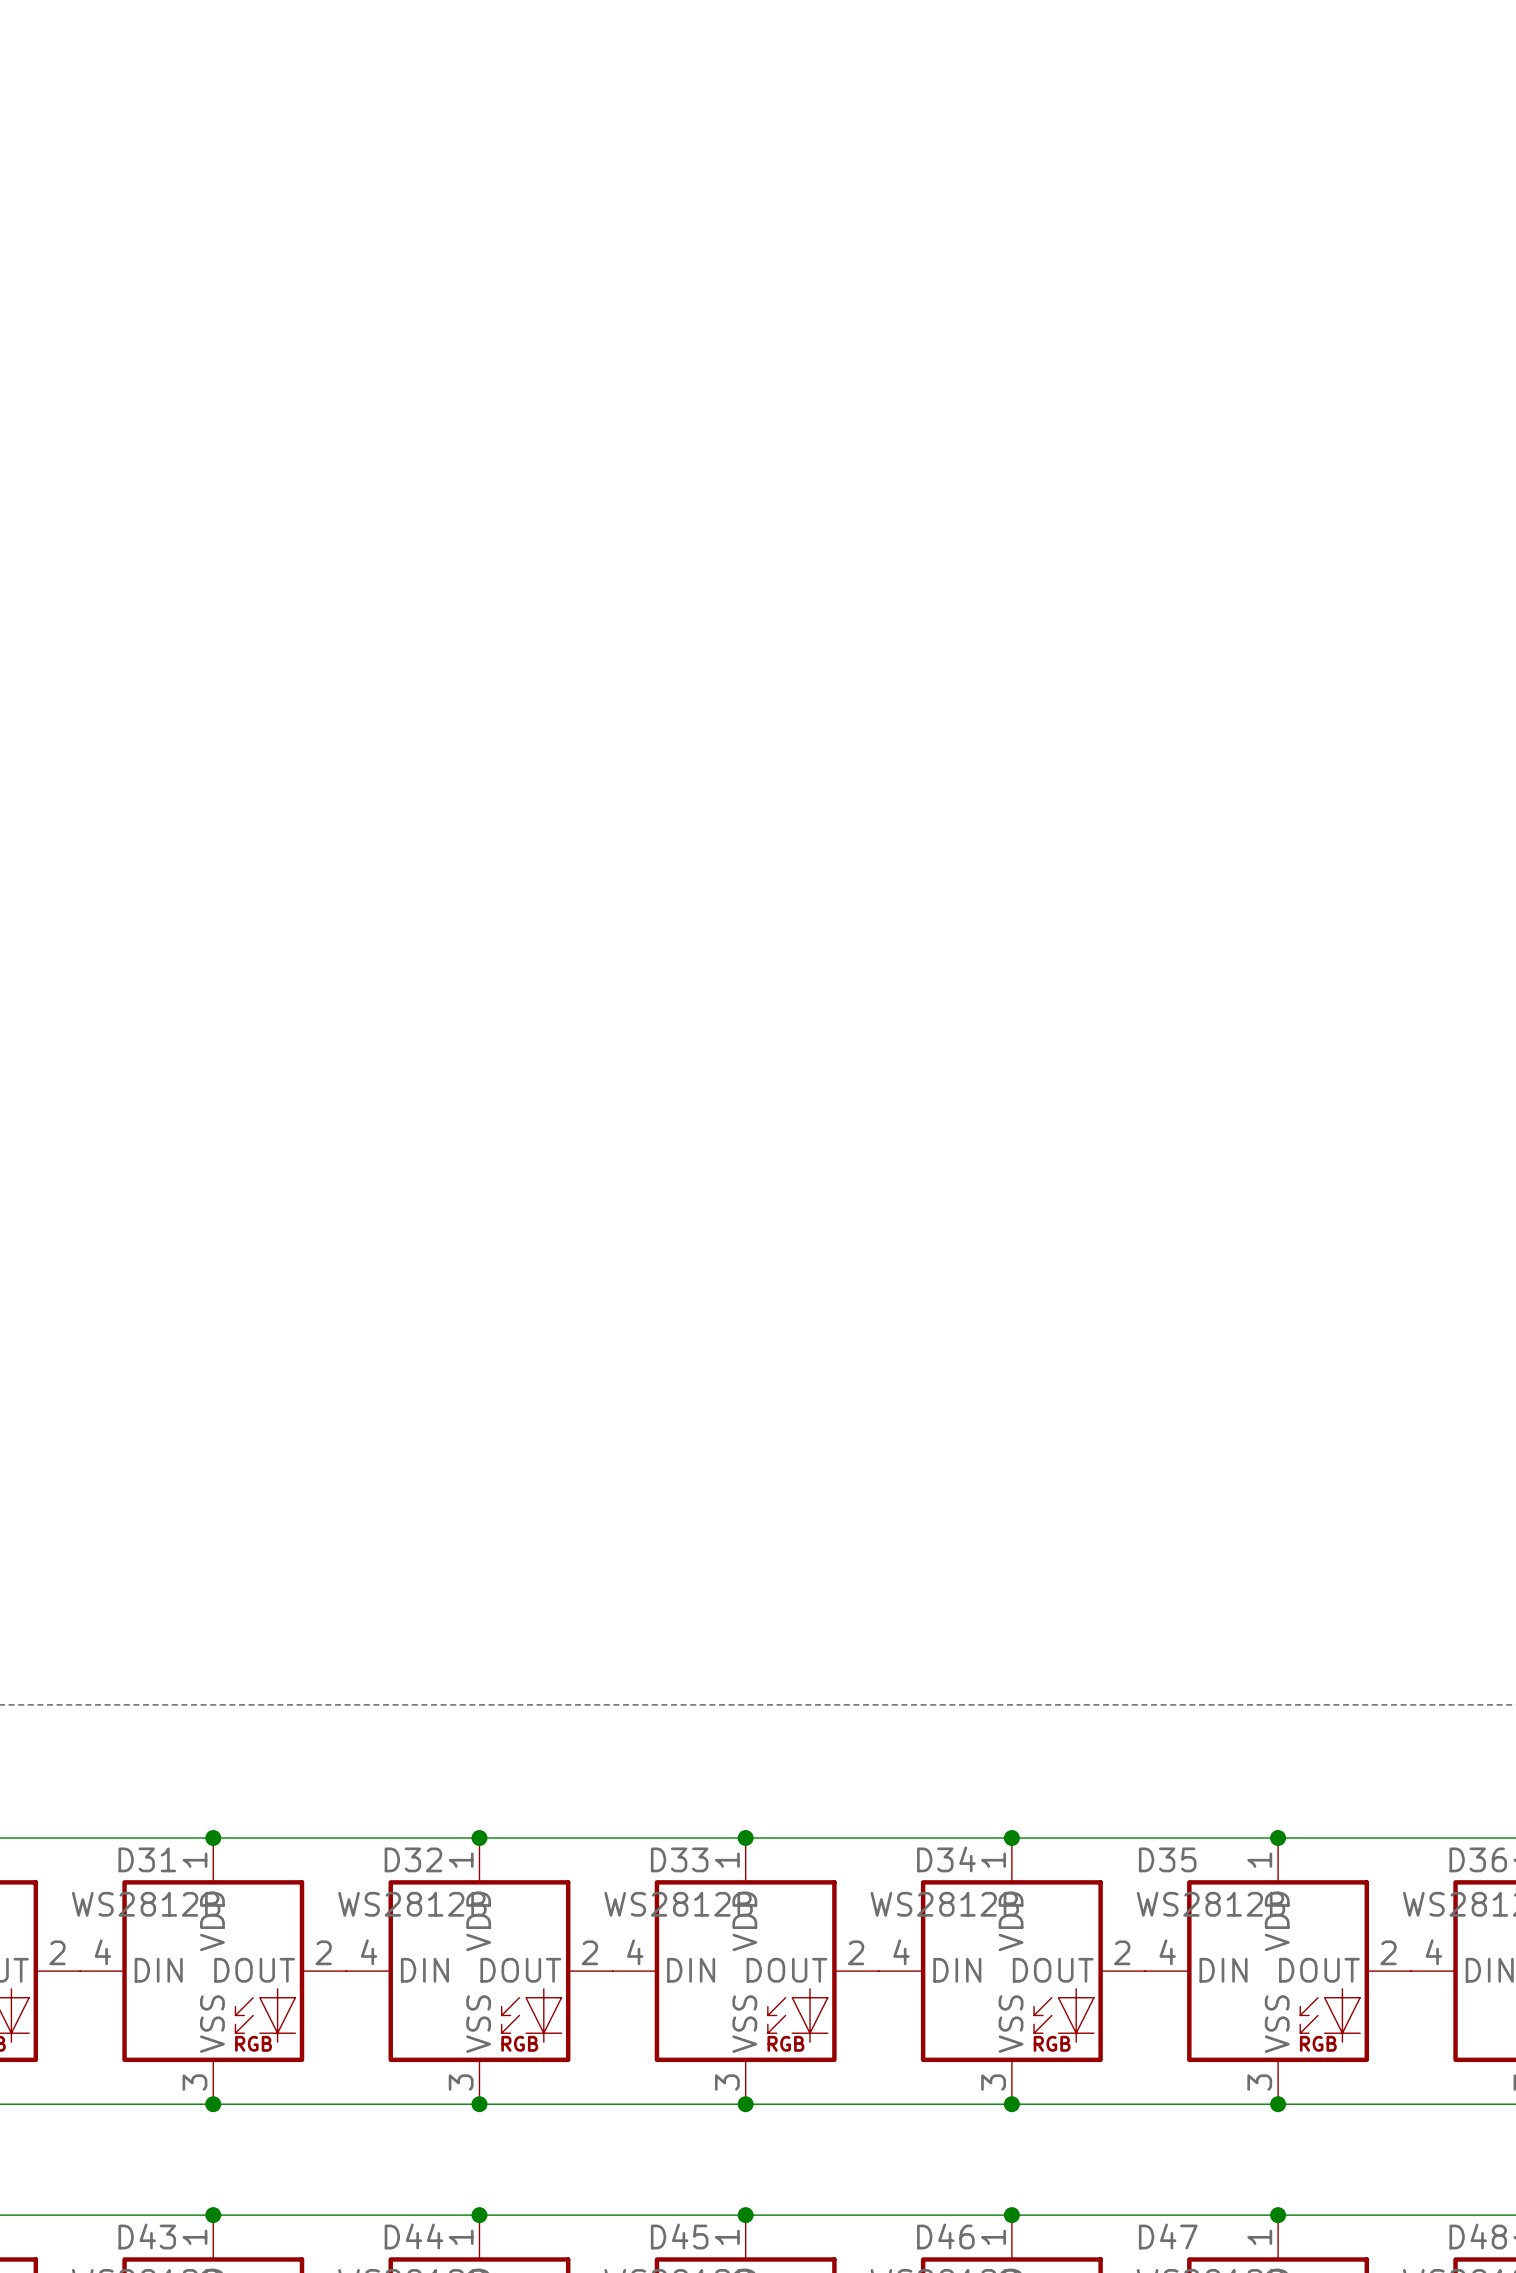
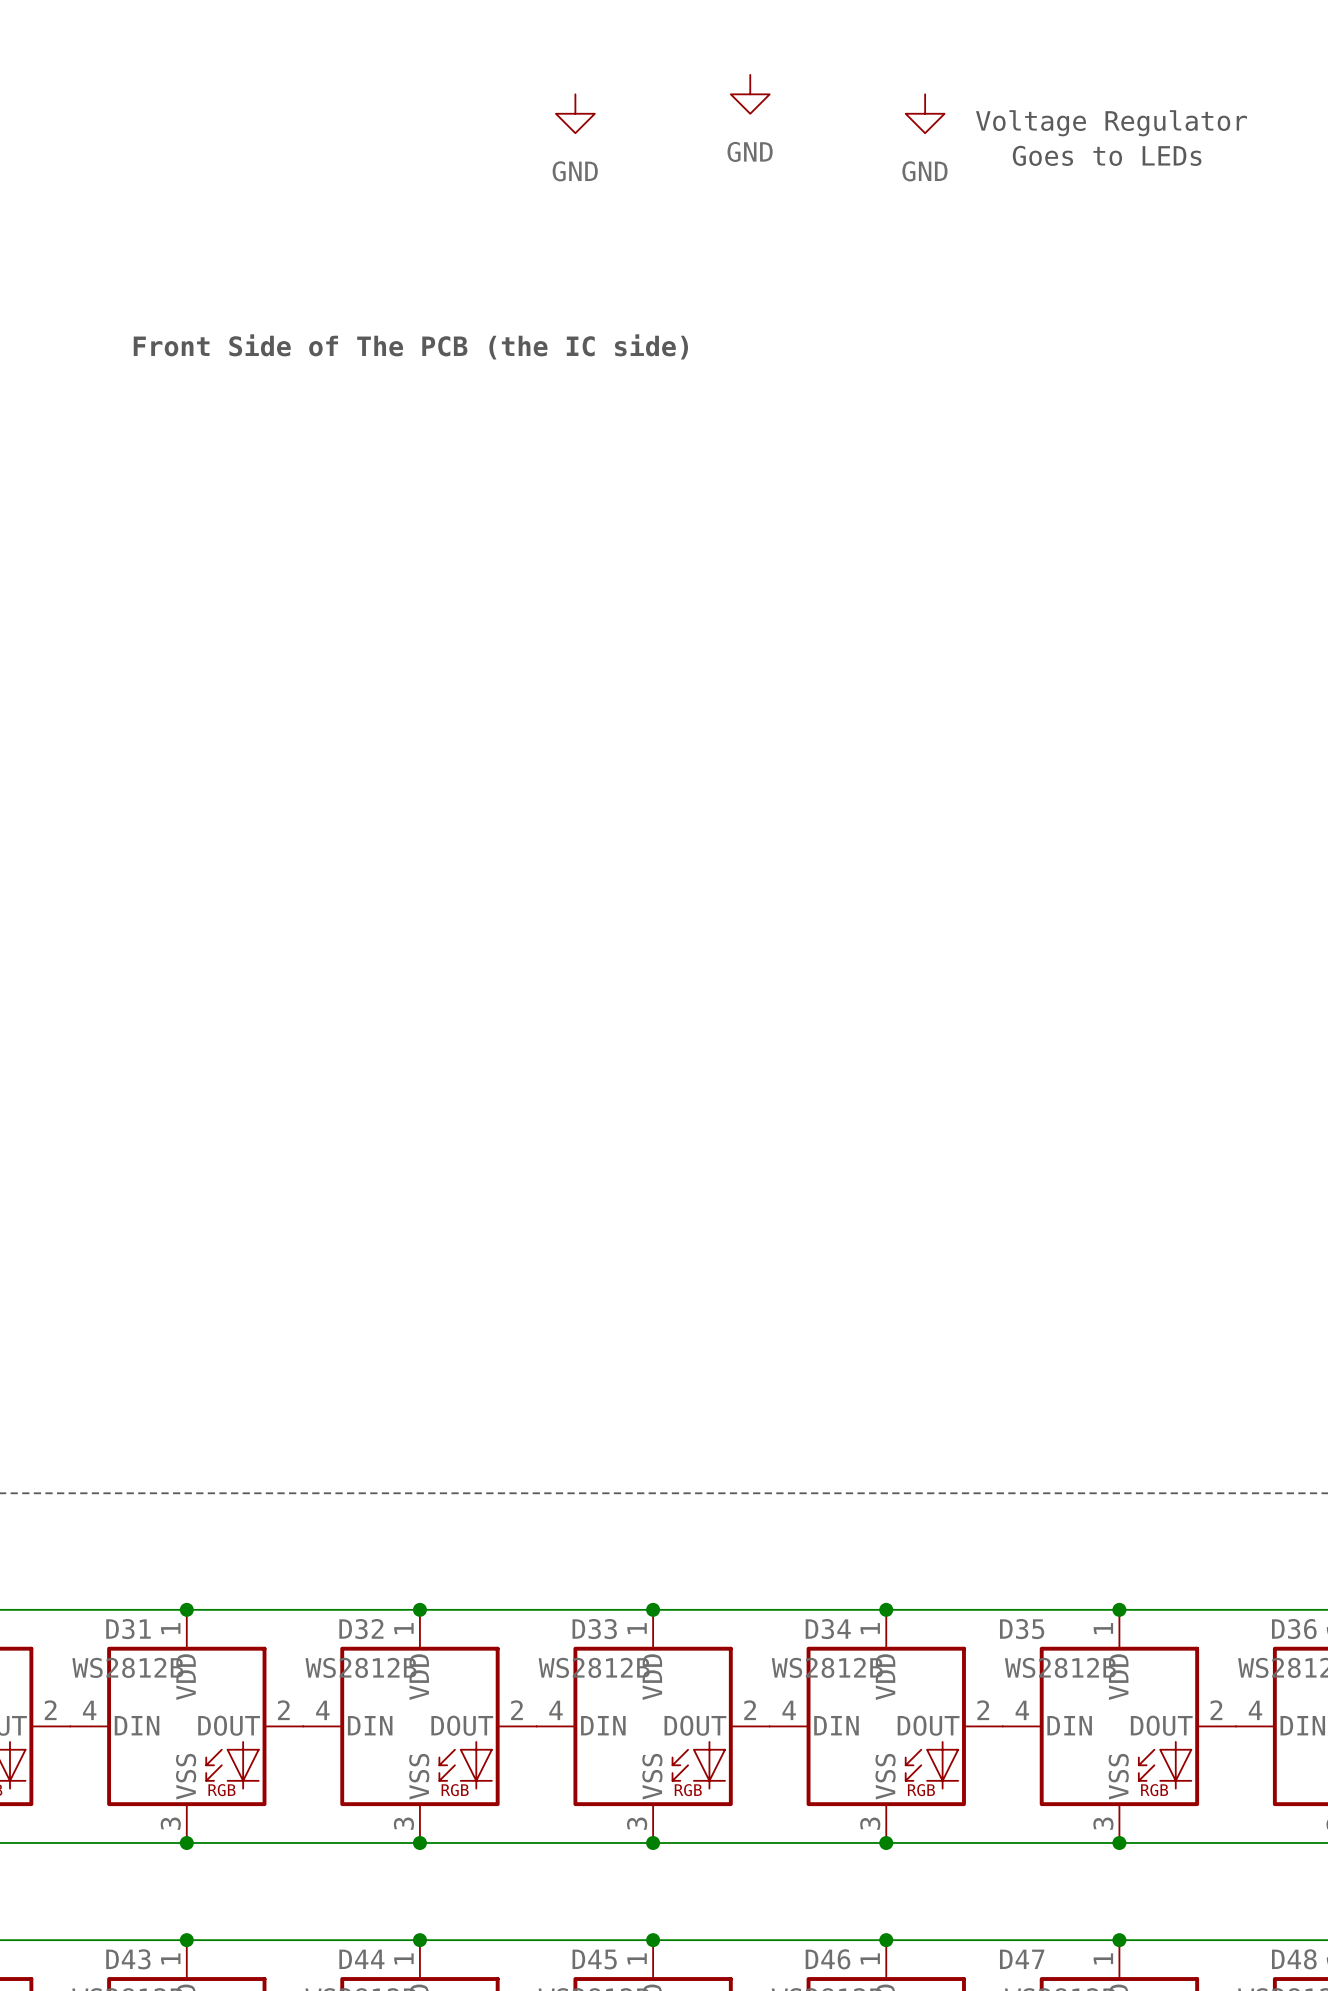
power symbol: none -> GND (750, 94)
power symbol: none -> GND (575, 113)
power symbol: none -> GND (925, 113)
text: none -> Voltage Regulator (1111, 123)
text: none -> Goes to LEDs (1107, 155)
text: none -> Front Side of The PCB (the IC side) (410, 346)

